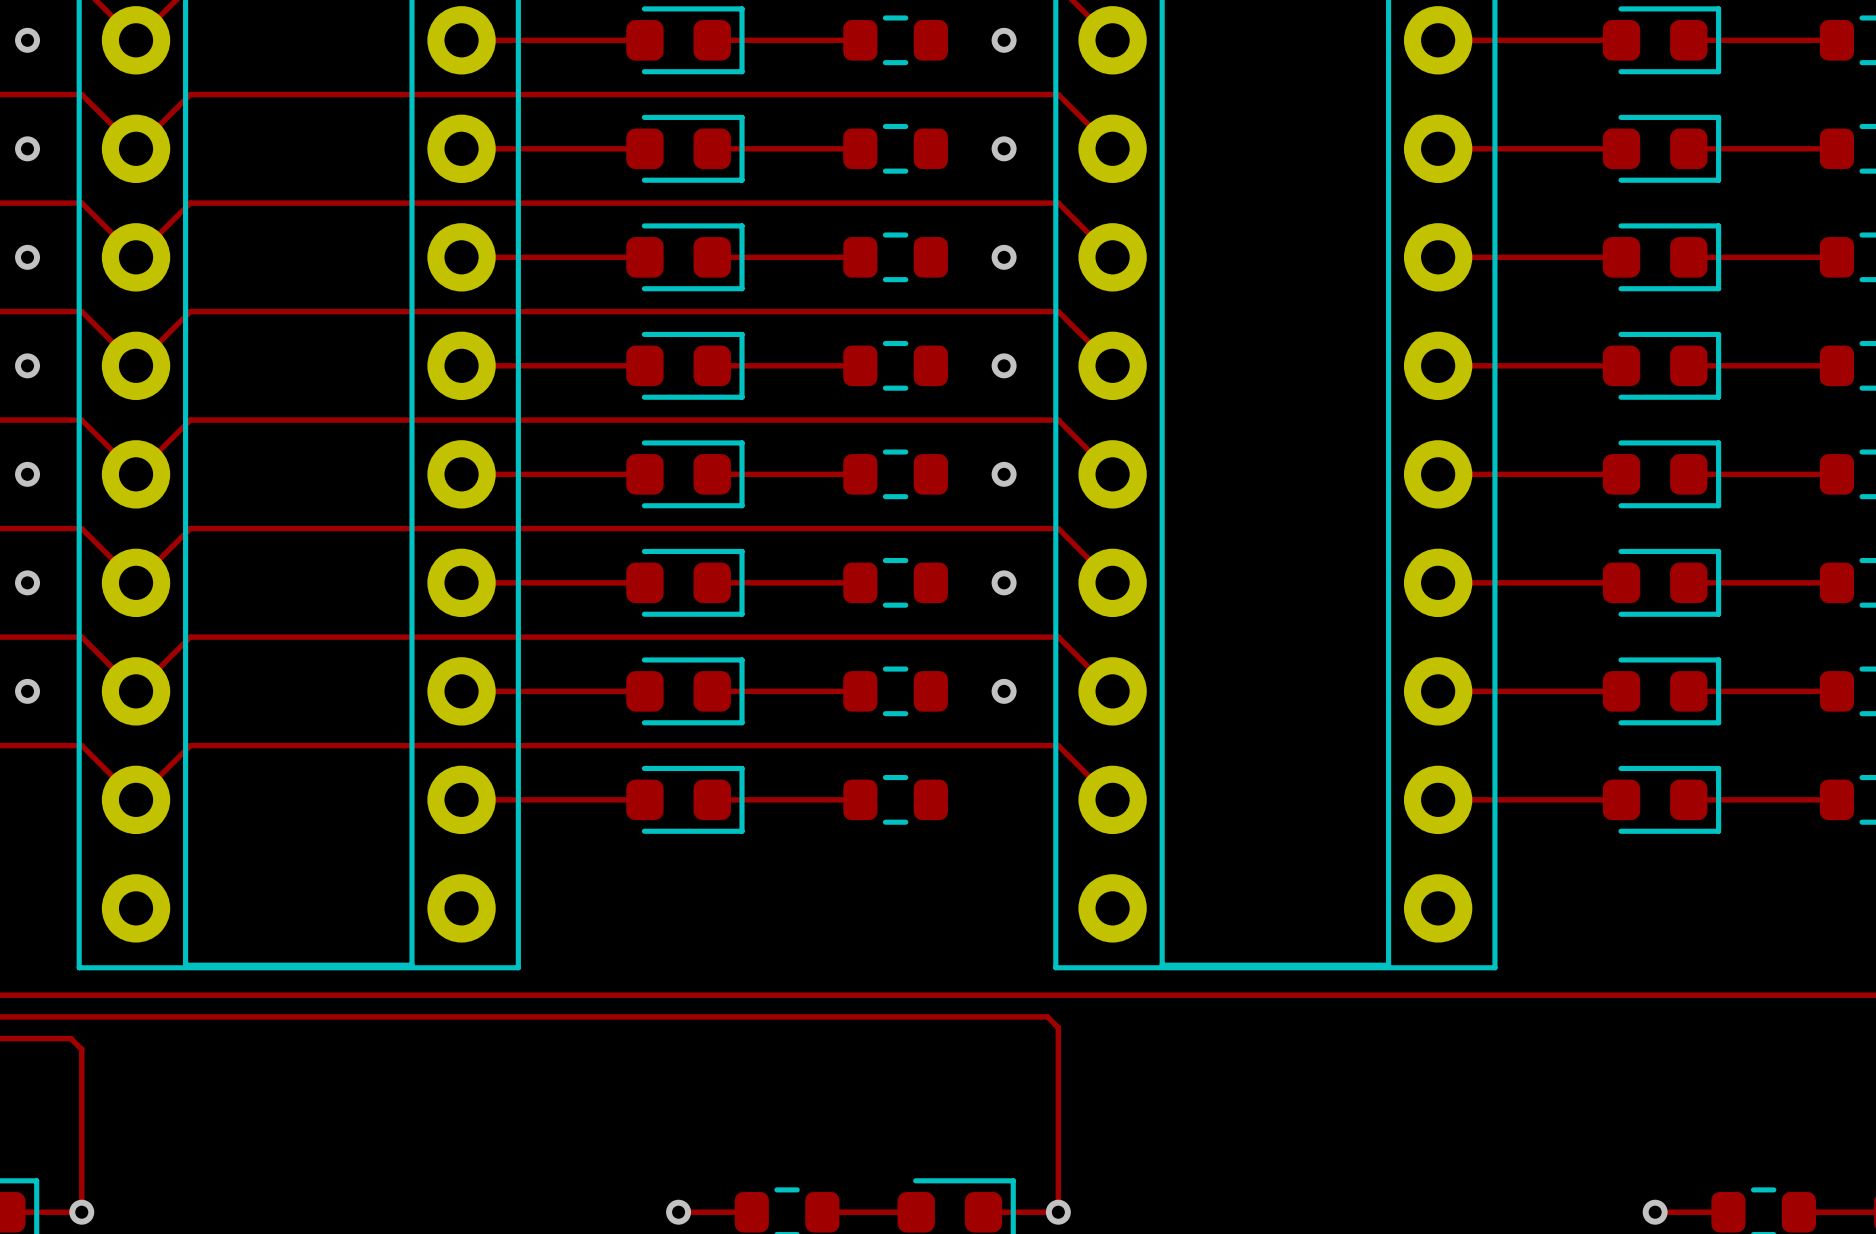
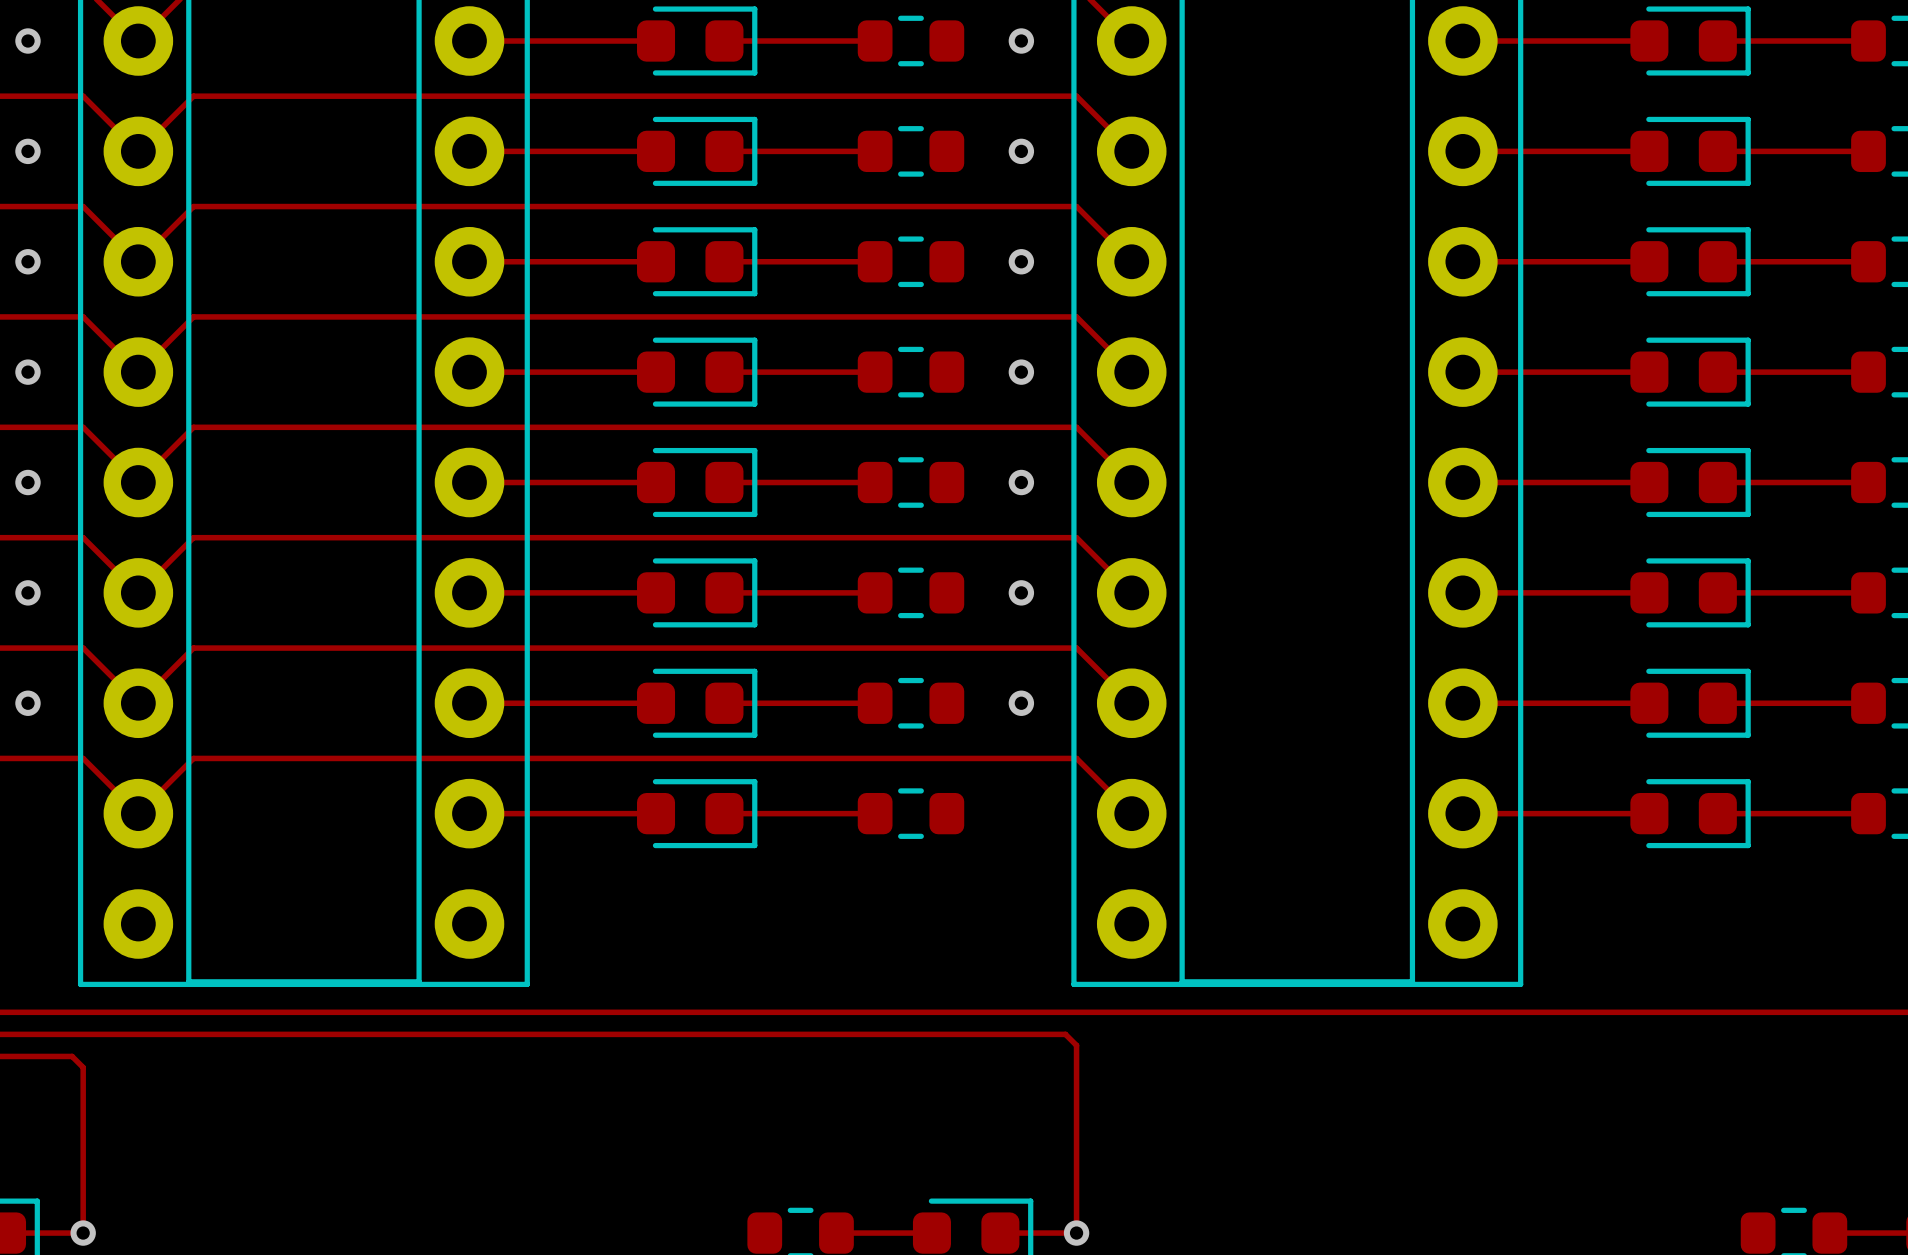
track: (678, 1212) (751, 1212) -> none
via: (678, 1212) -> none
track: (1655, 1212) (1728, 1212) -> none
via: (1655, 1212) -> none

